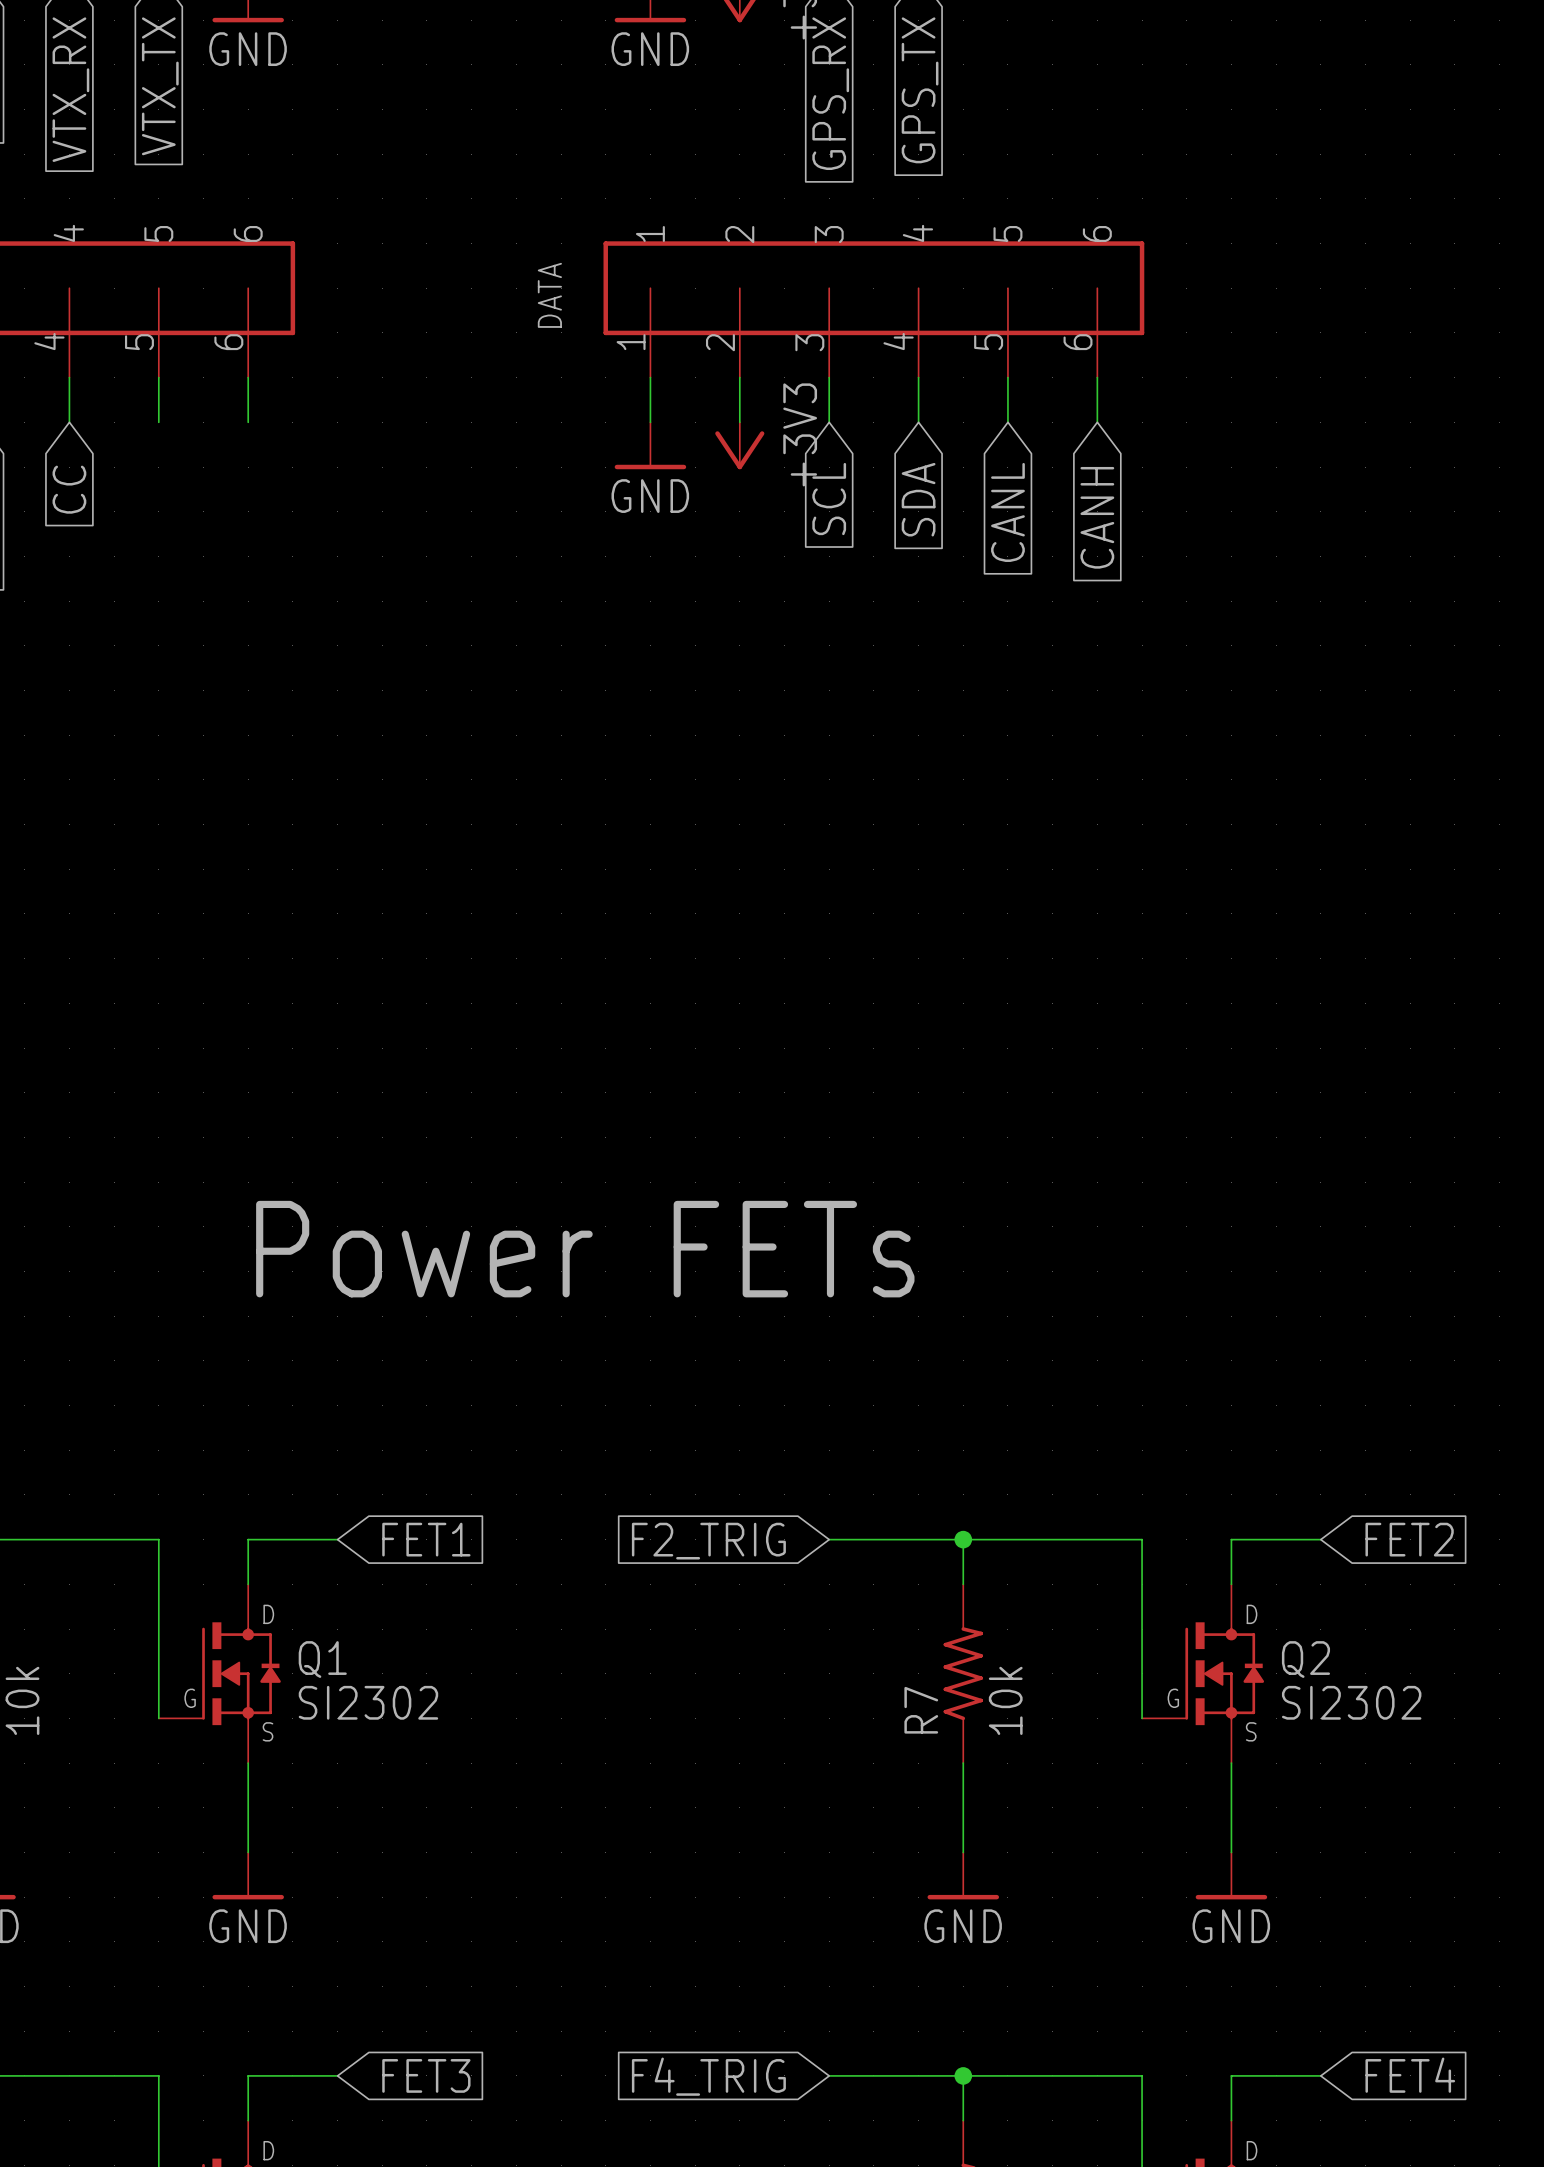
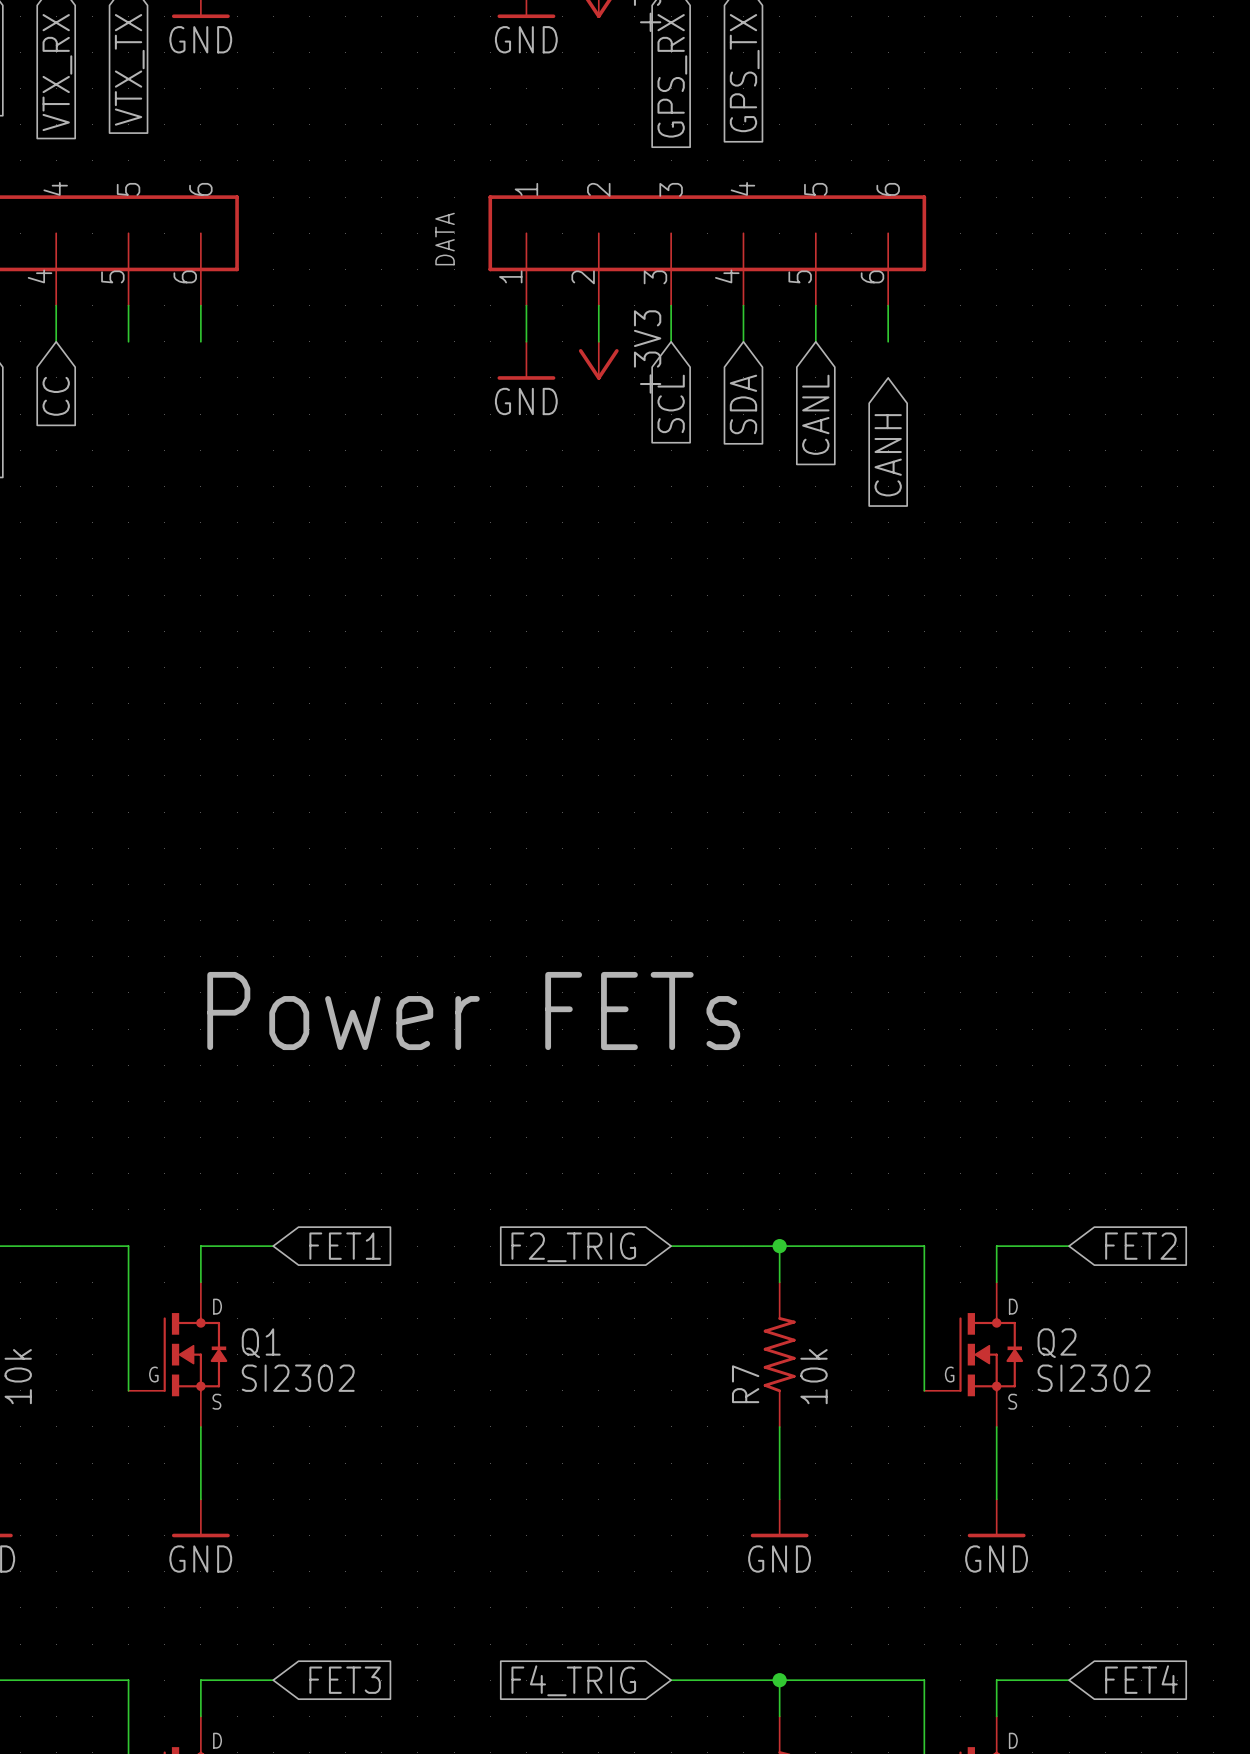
global label position: CANH (1097, 517) -> CANH (888, 455)

